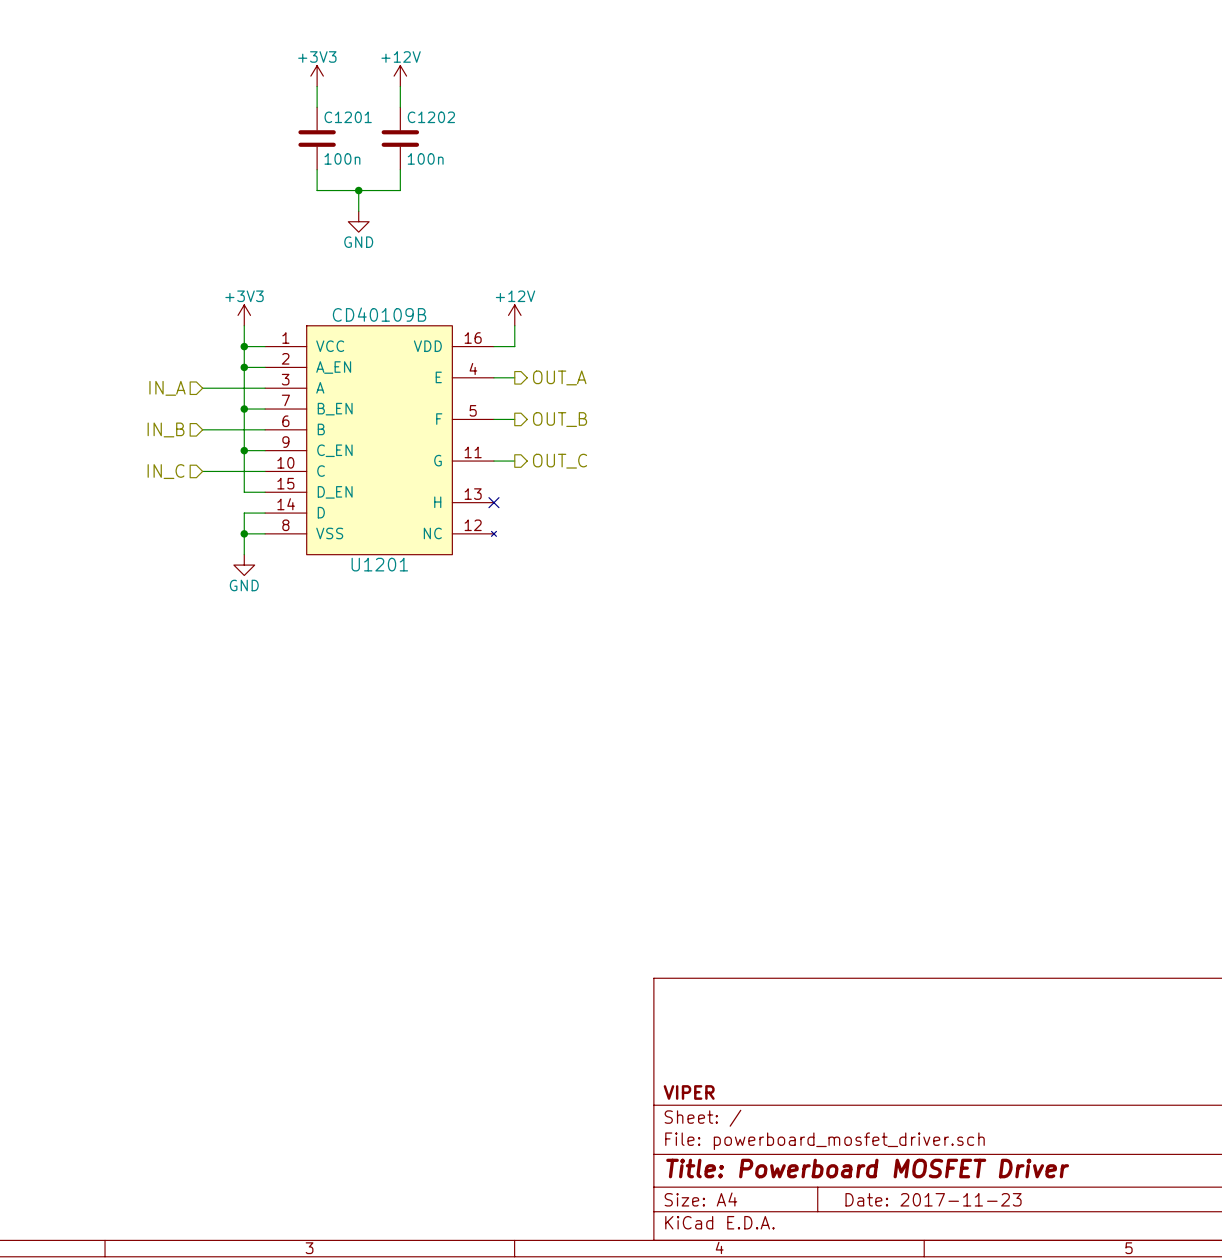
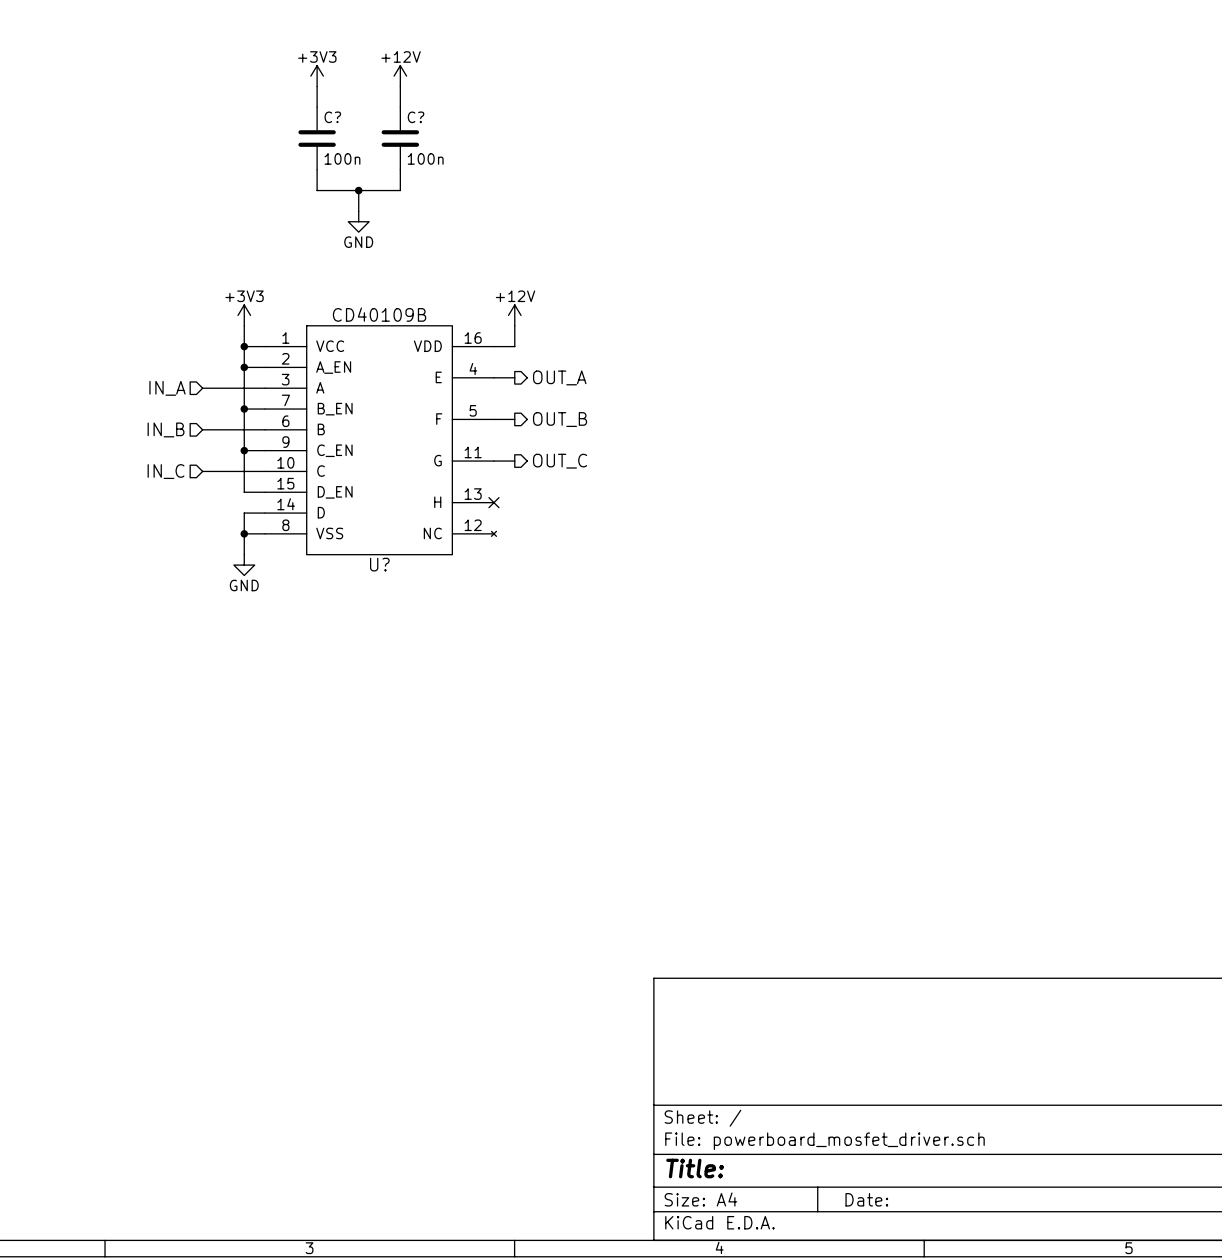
C1201 name: C1201 (348, 117) -> C? (332, 117)
C1202 name: C1202 (431, 117) -> C? (416, 117)
U1201 name: U1201 (379, 564) -> U? (379, 564)
title block: VIPER (689, 1092) -> none
title block: Title: Powerboard MOSFET Driver (867, 1168) -> Title: (695, 1168)
title block: Date: 2017-11-23 (933, 1199) -> Date: (866, 1199)

